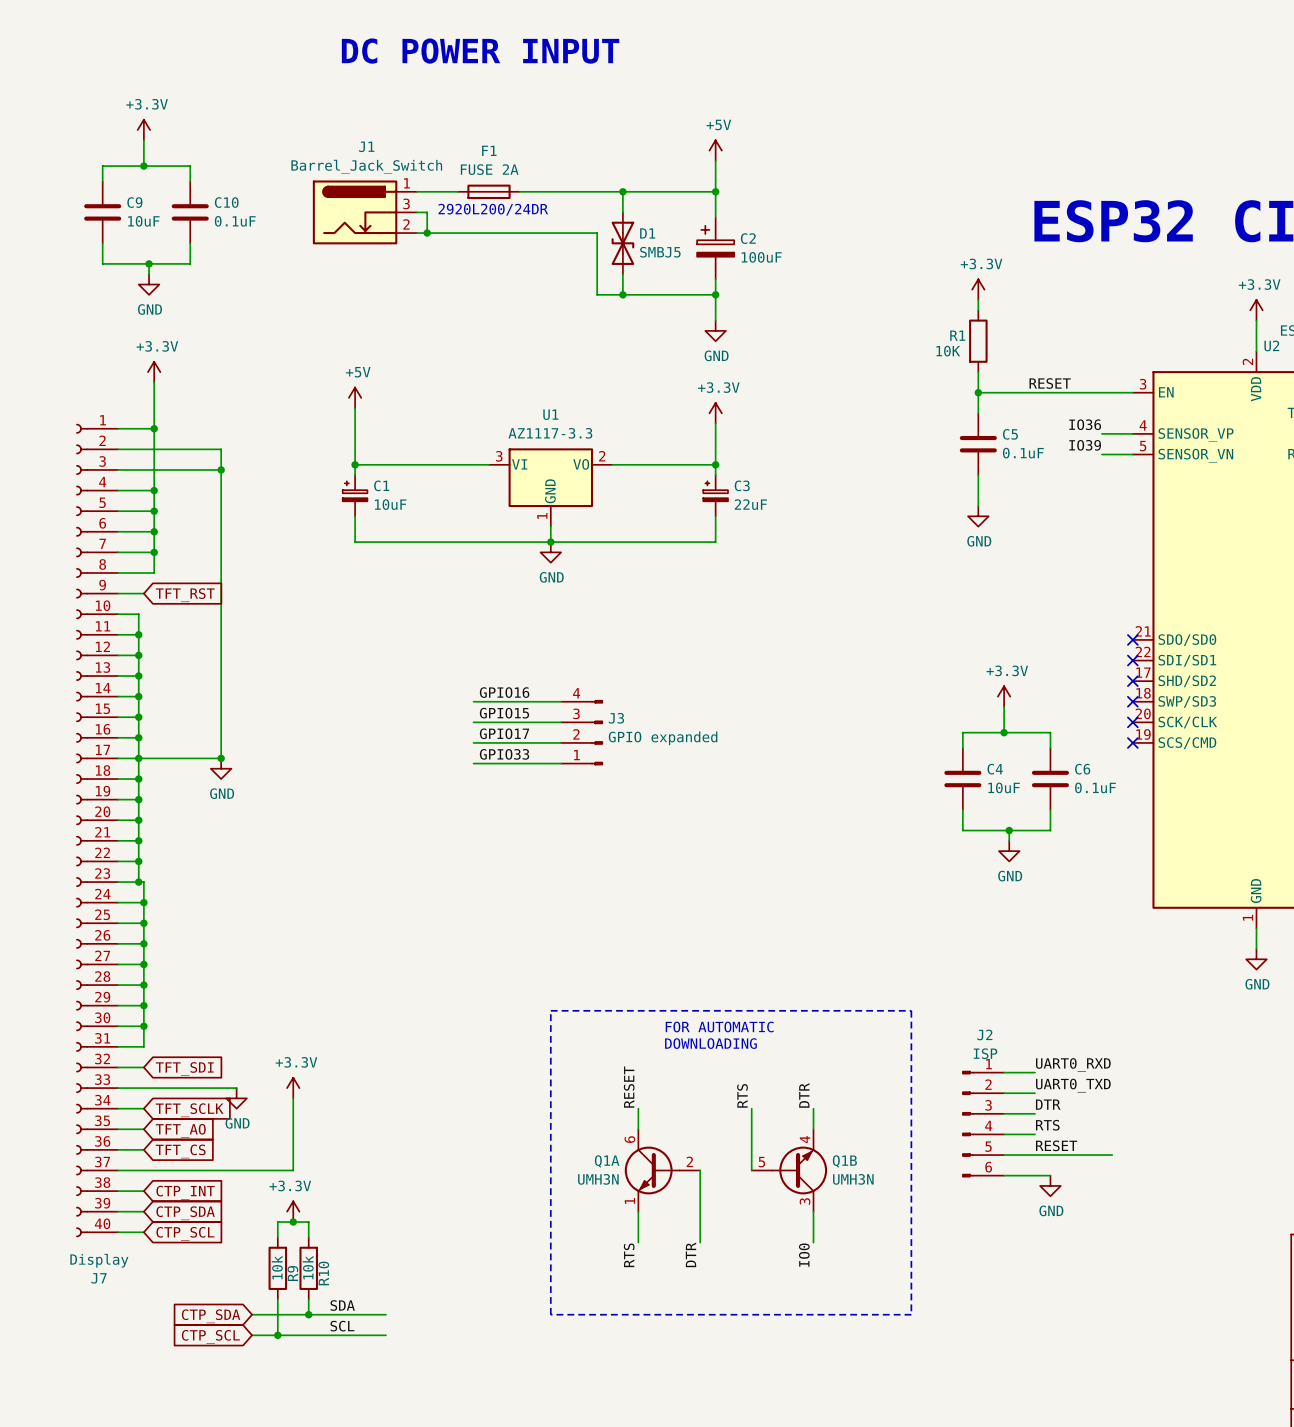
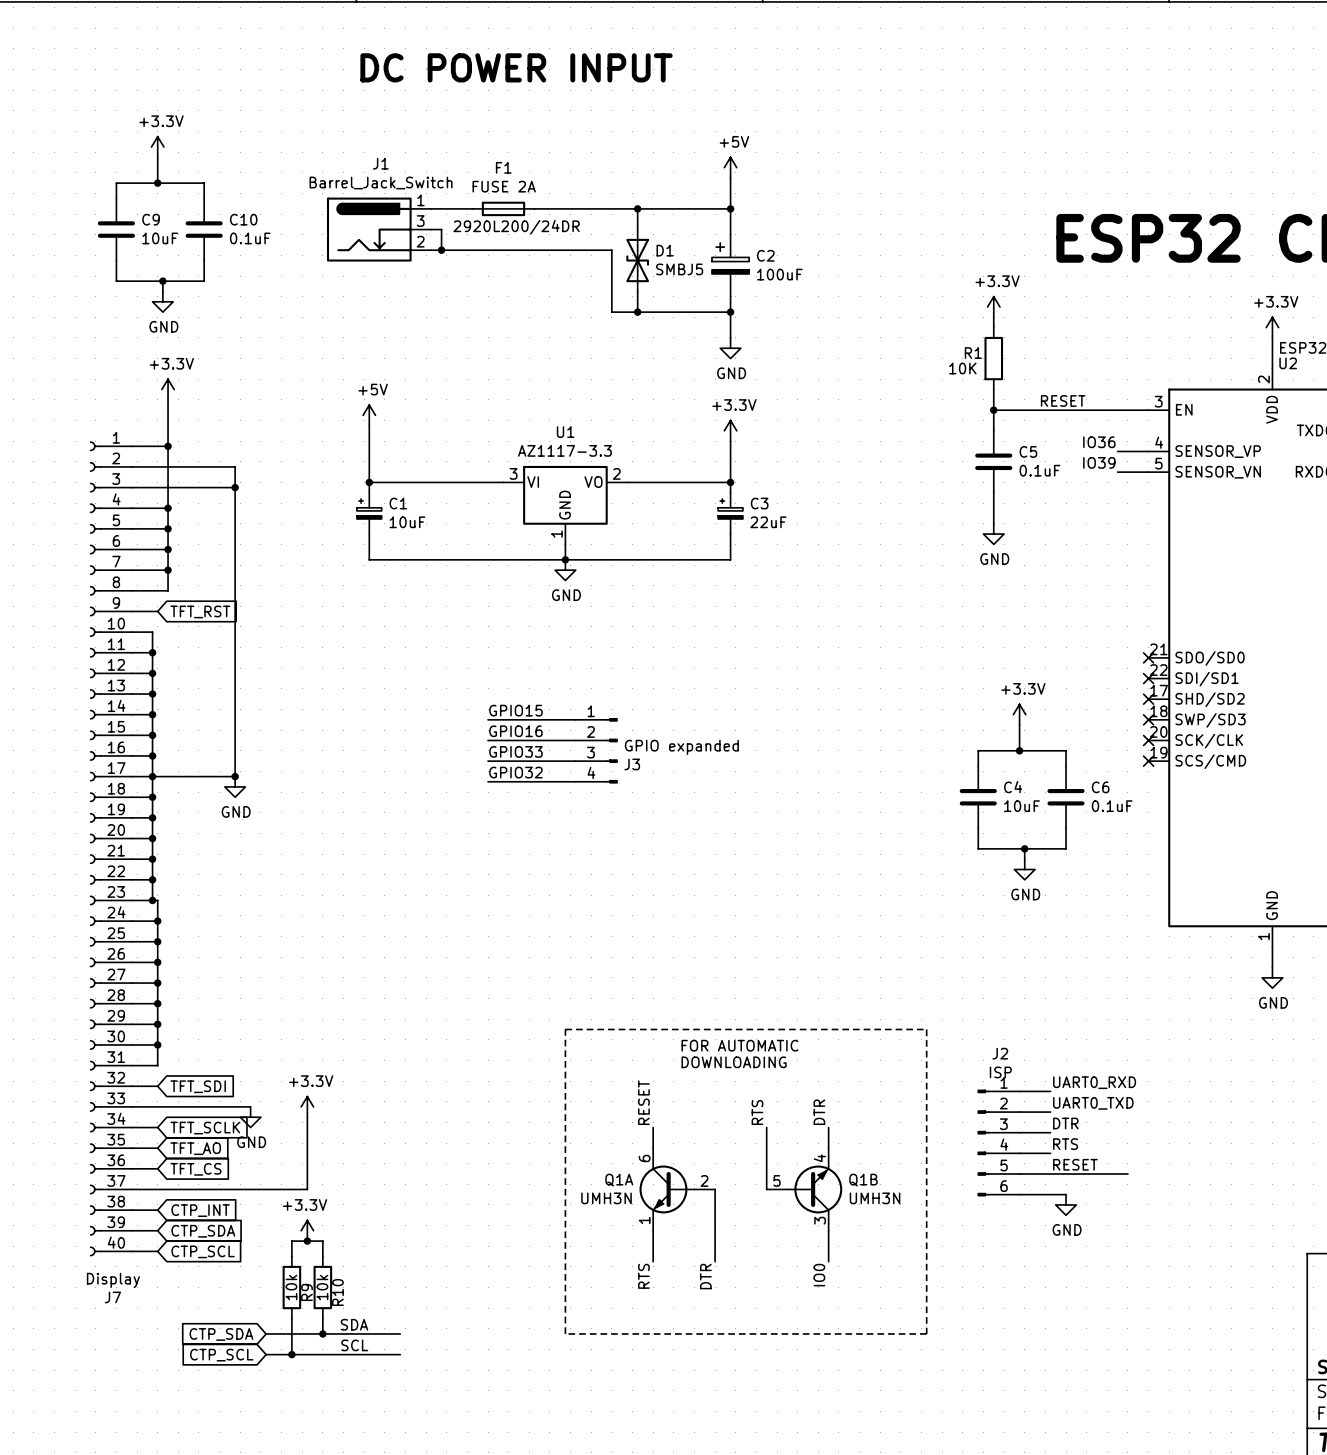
label: GPIO16 (504, 692) -> GPIO15 (515, 710)
label: GPIO15 (504, 713) -> GPIO16 (515, 731)
J3 flip: as is (597, 732) -> up-down (611, 750)
label: GPIO17 (504, 733) -> GPIO33 (515, 751)
label: GPIO33 (504, 754) -> GPIO32 (515, 772)

